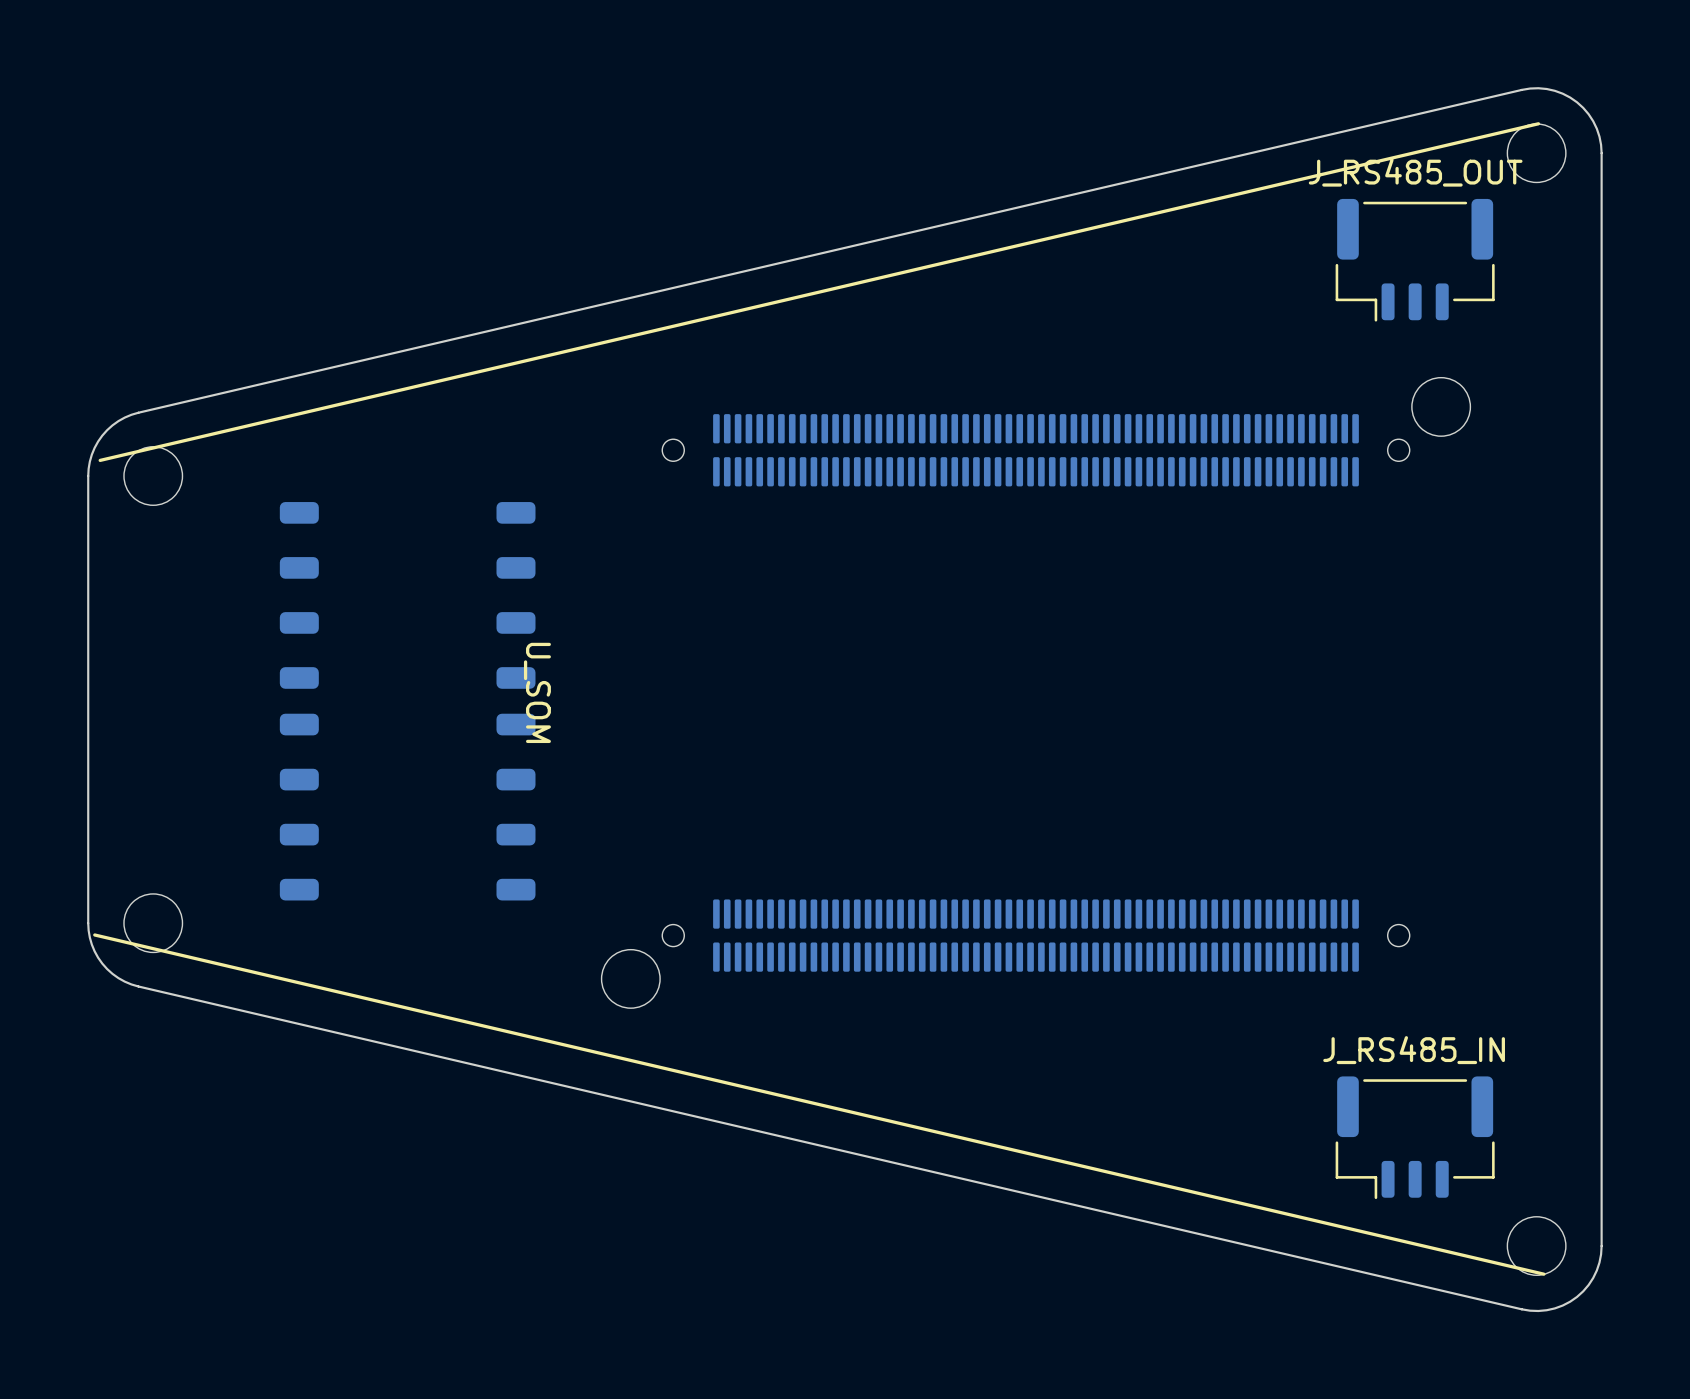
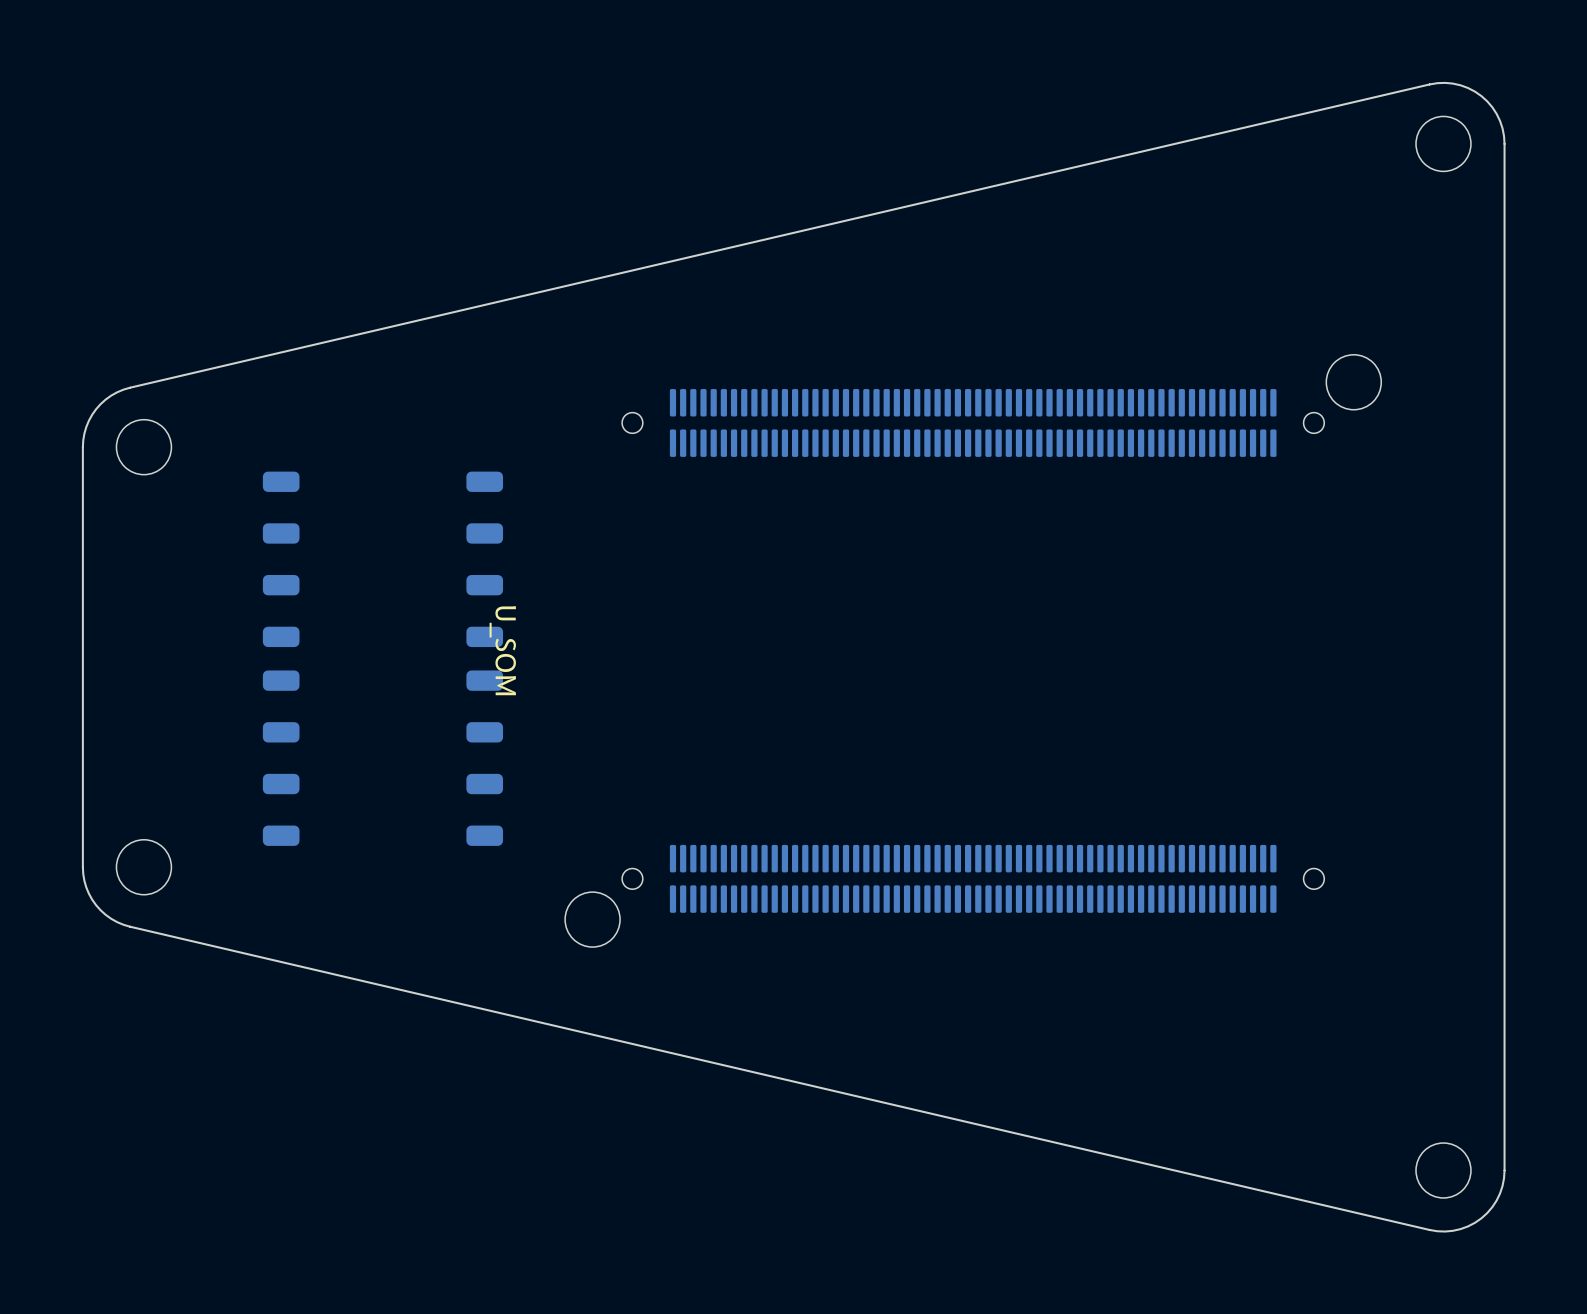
line: (1538, 123) (100, 460) -> none
J_RS485_OUT: (1415, 260) -> none
line: (94, 934) (1543, 1274) -> none
J_RS485_IN: (1415, 1137) -> none

